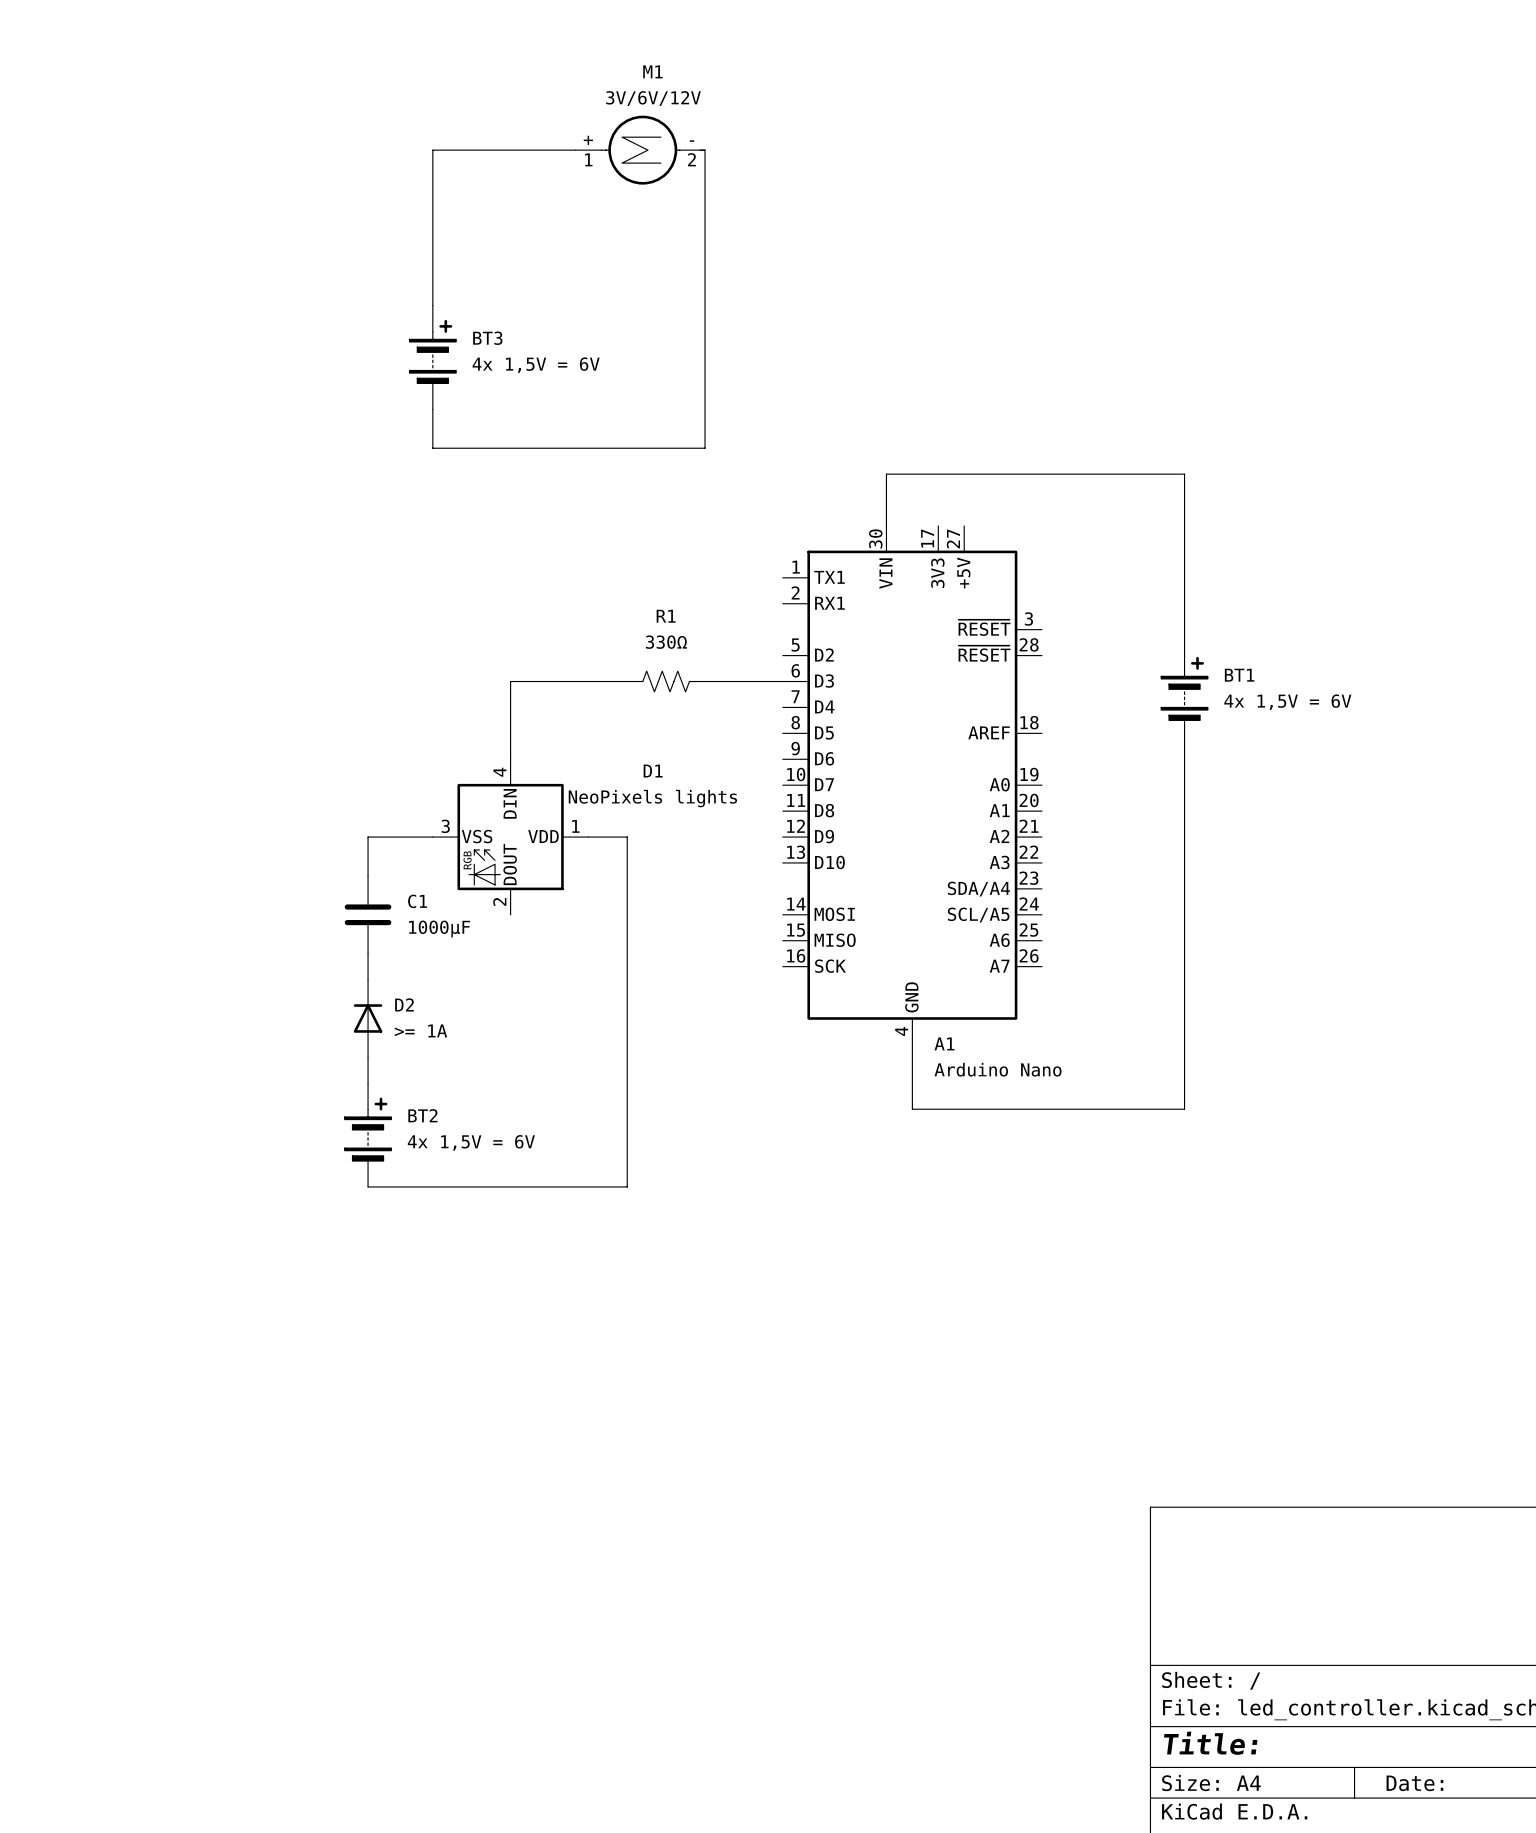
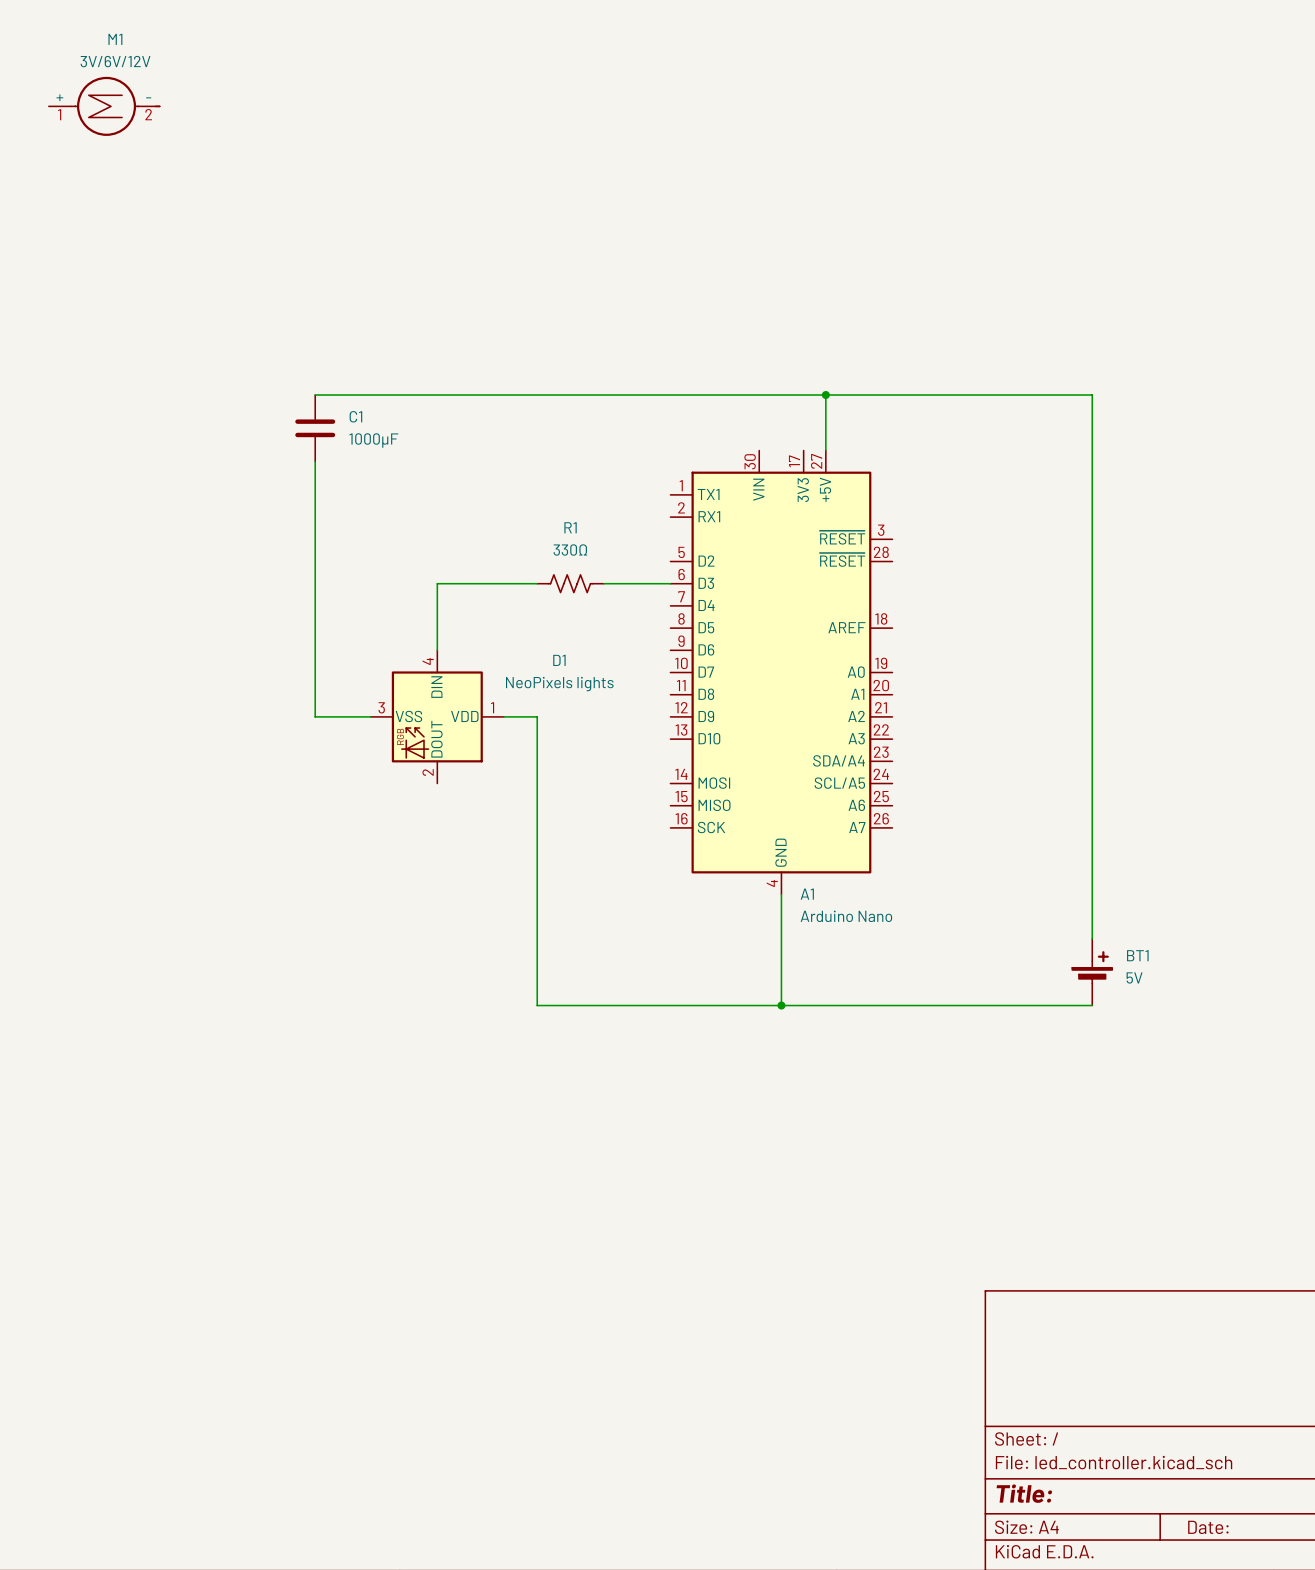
wire: (575, 150) (432, 150) (432, 305) -> none
M1 position: (640, 150) -> (104, 106)
wire: (705, 150) (705, 448) (432, 448) (432, 409) -> none
BT3: 4x 1,5V = 6V (432, 357) -> none
wire: none -> (315, 395) (1092, 395) (1092, 938)
wire: none -> (825, 395) (825, 450)
junction: none -> (825, 395)
wire: (886, 525) (886, 474) (1184, 474) (1184, 642) -> none
BT1 symbol: [1161, 642, 1208, 747] -> [1072, 938, 1113, 1006]
BT1 value: 4x 1,5V = 6V (1287, 702) -> 5V (1134, 977)
wire: (1184, 746) (1184, 1109) (912, 1109) -> (781, 1005) (781, 950)
wire: (368, 837) (368, 875) -> (315, 716) (315, 461)
C1 position: (368, 914) -> (315, 428)
wire: (368, 953) (368, 979) -> none
D2: >= 1A (368, 1018) -> none
wire: (368, 1057) (368, 1083) -> none
BT2: 4x 1,5V = 6V (368, 1135) -> none
wire: (627, 1174) (627, 1186) (368, 1186) -> (537, 1005) (1092, 1005)
junction: none -> (781, 1005)

